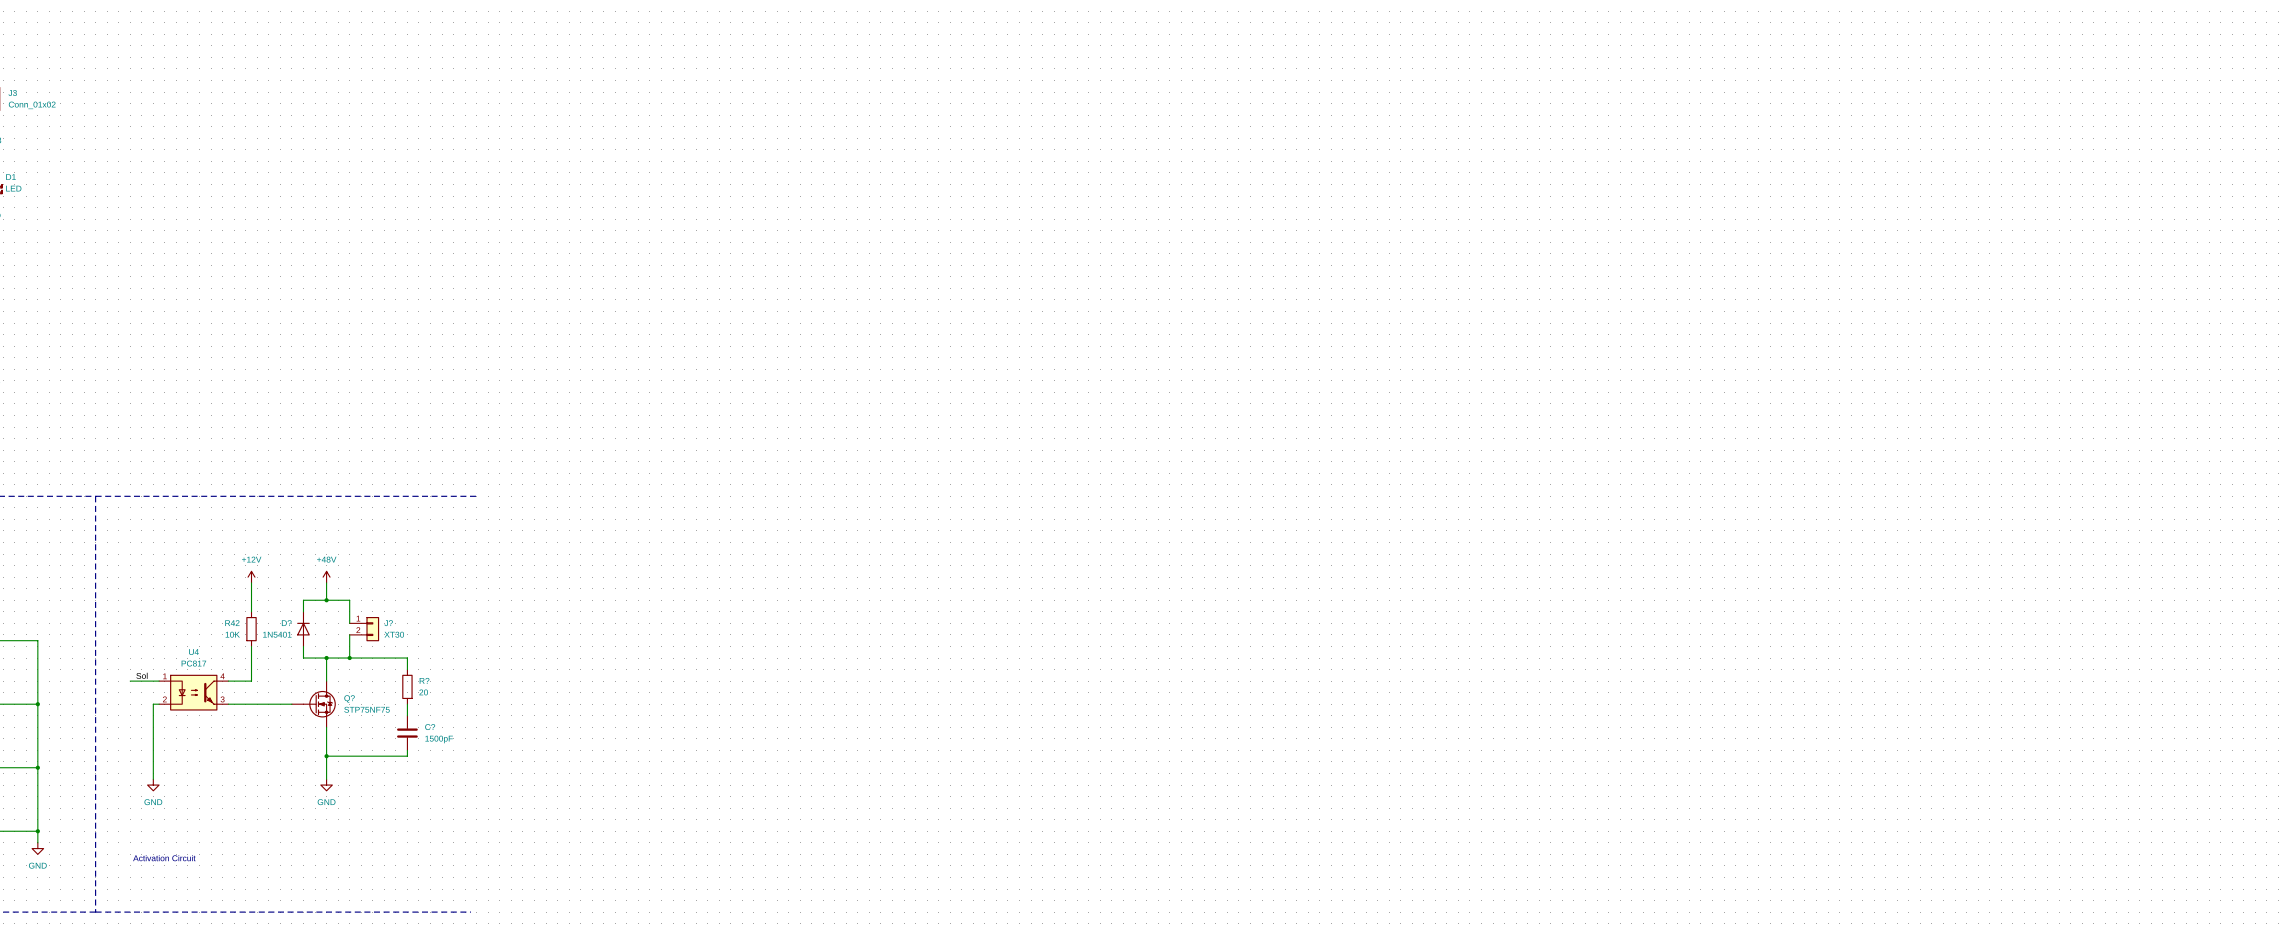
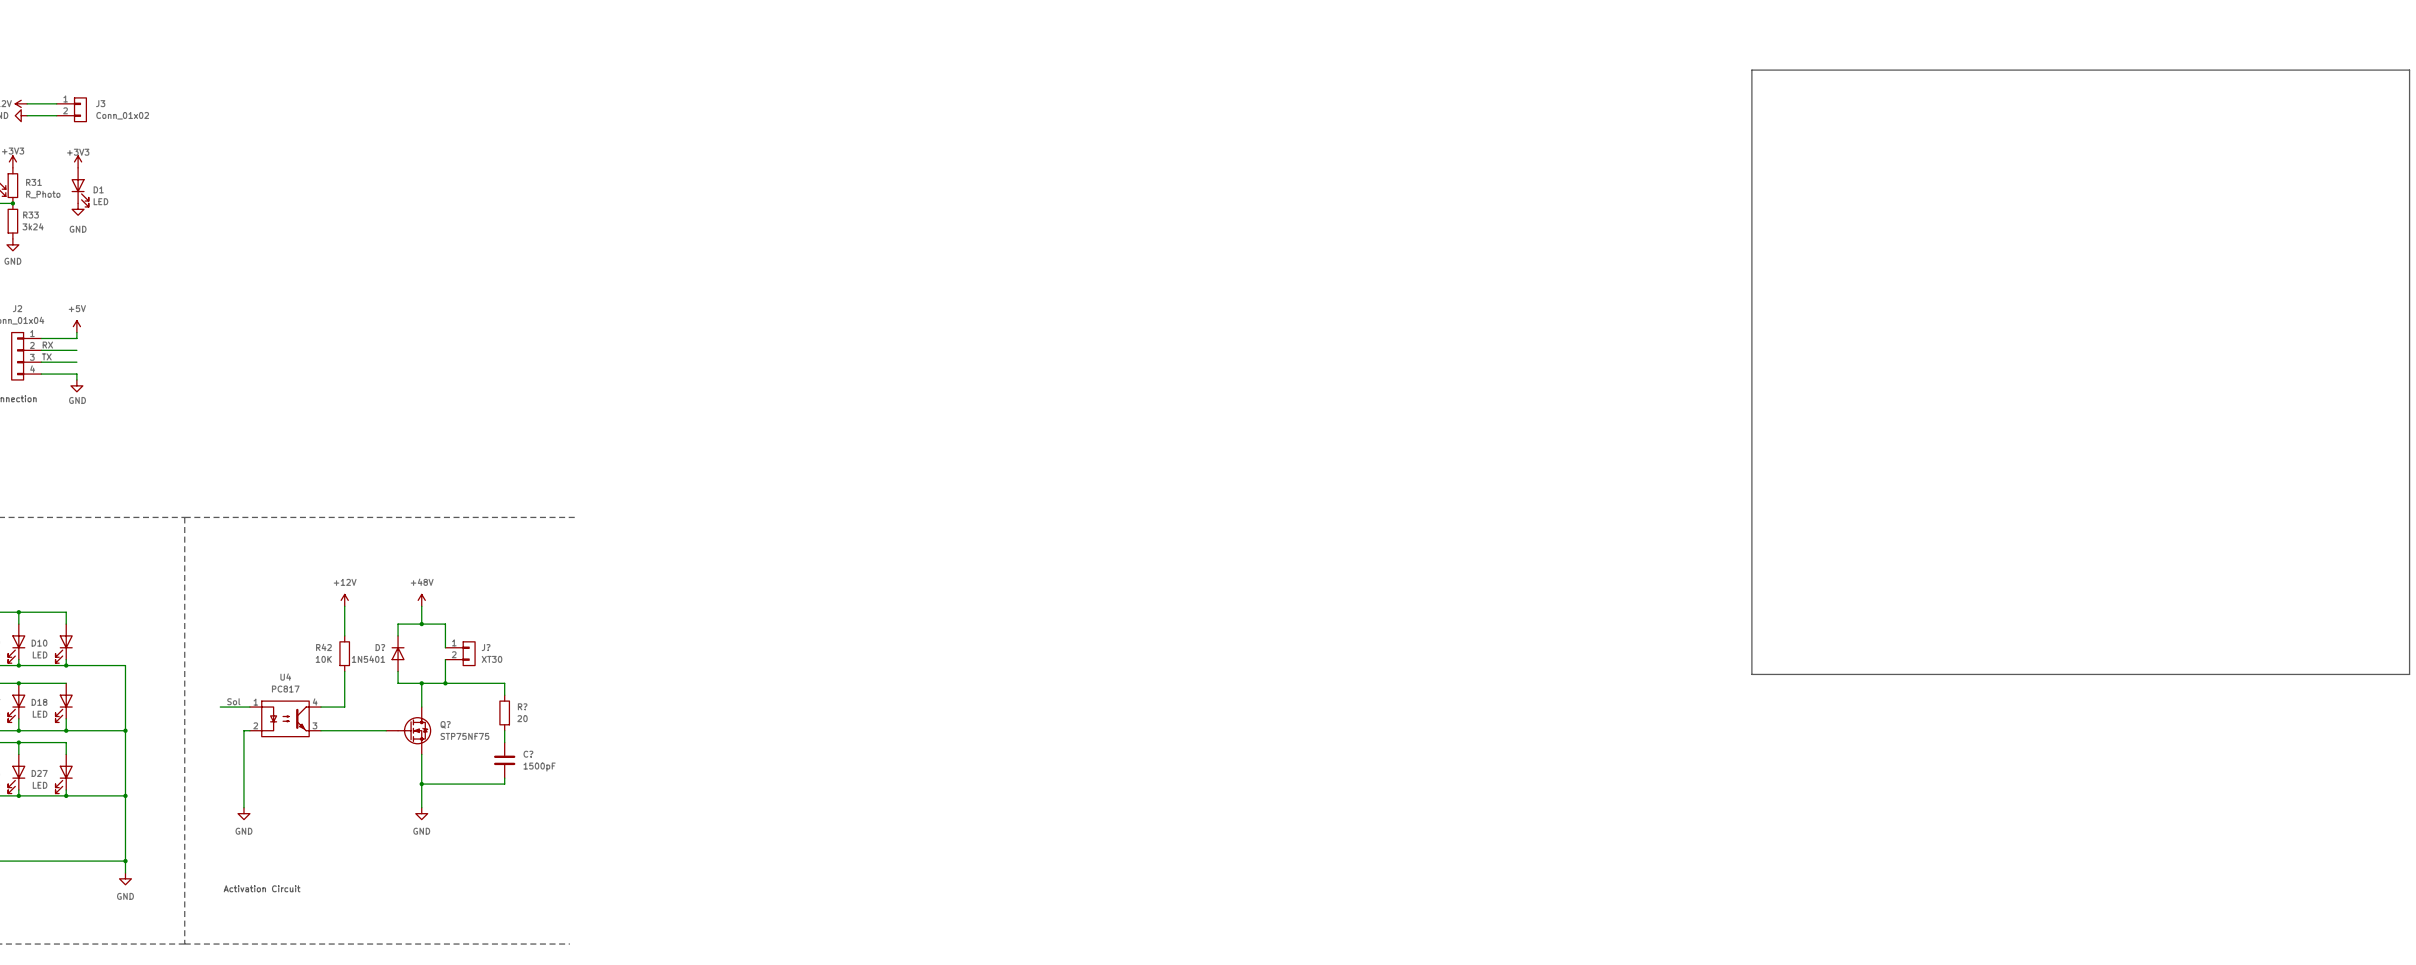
line: none -> (1751, 70) (2409, 70) (2409, 674) (1751, 674) (1751, 70)

